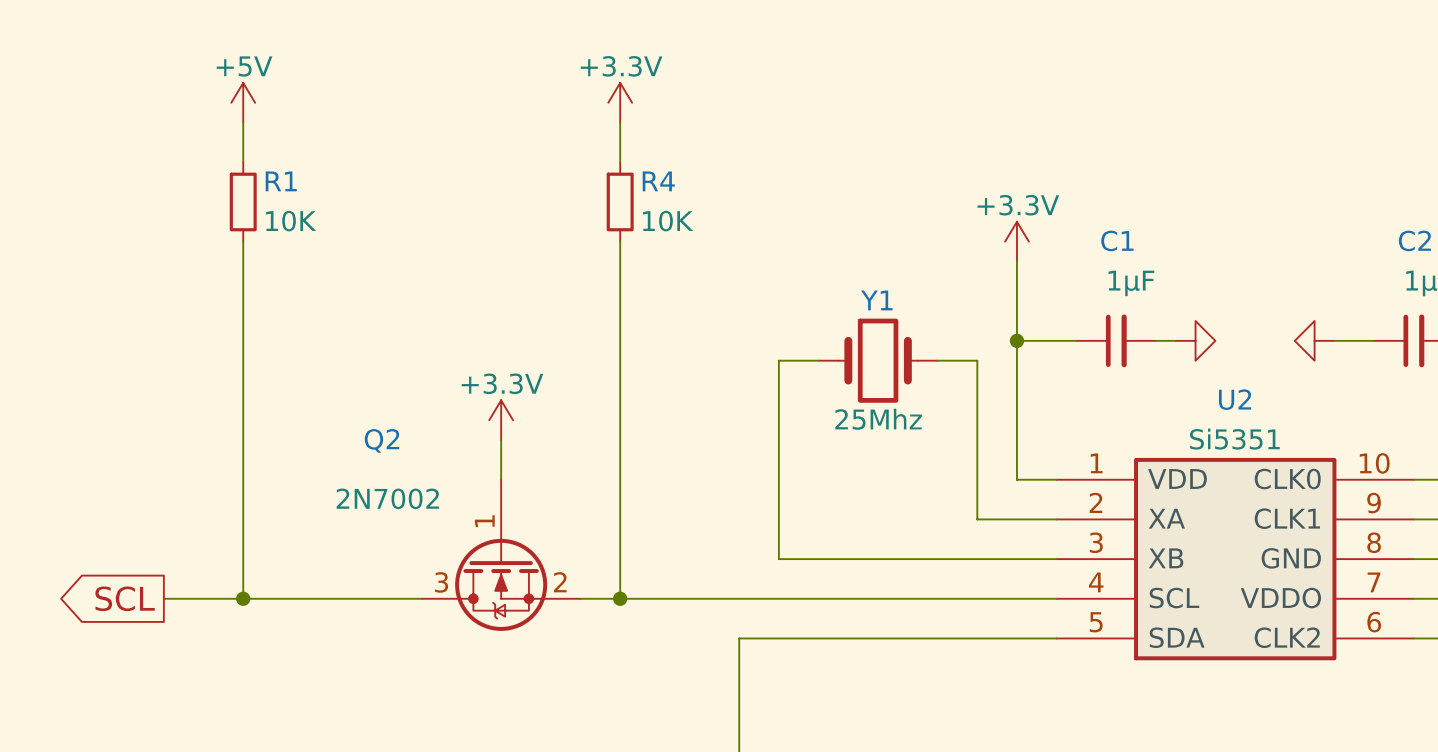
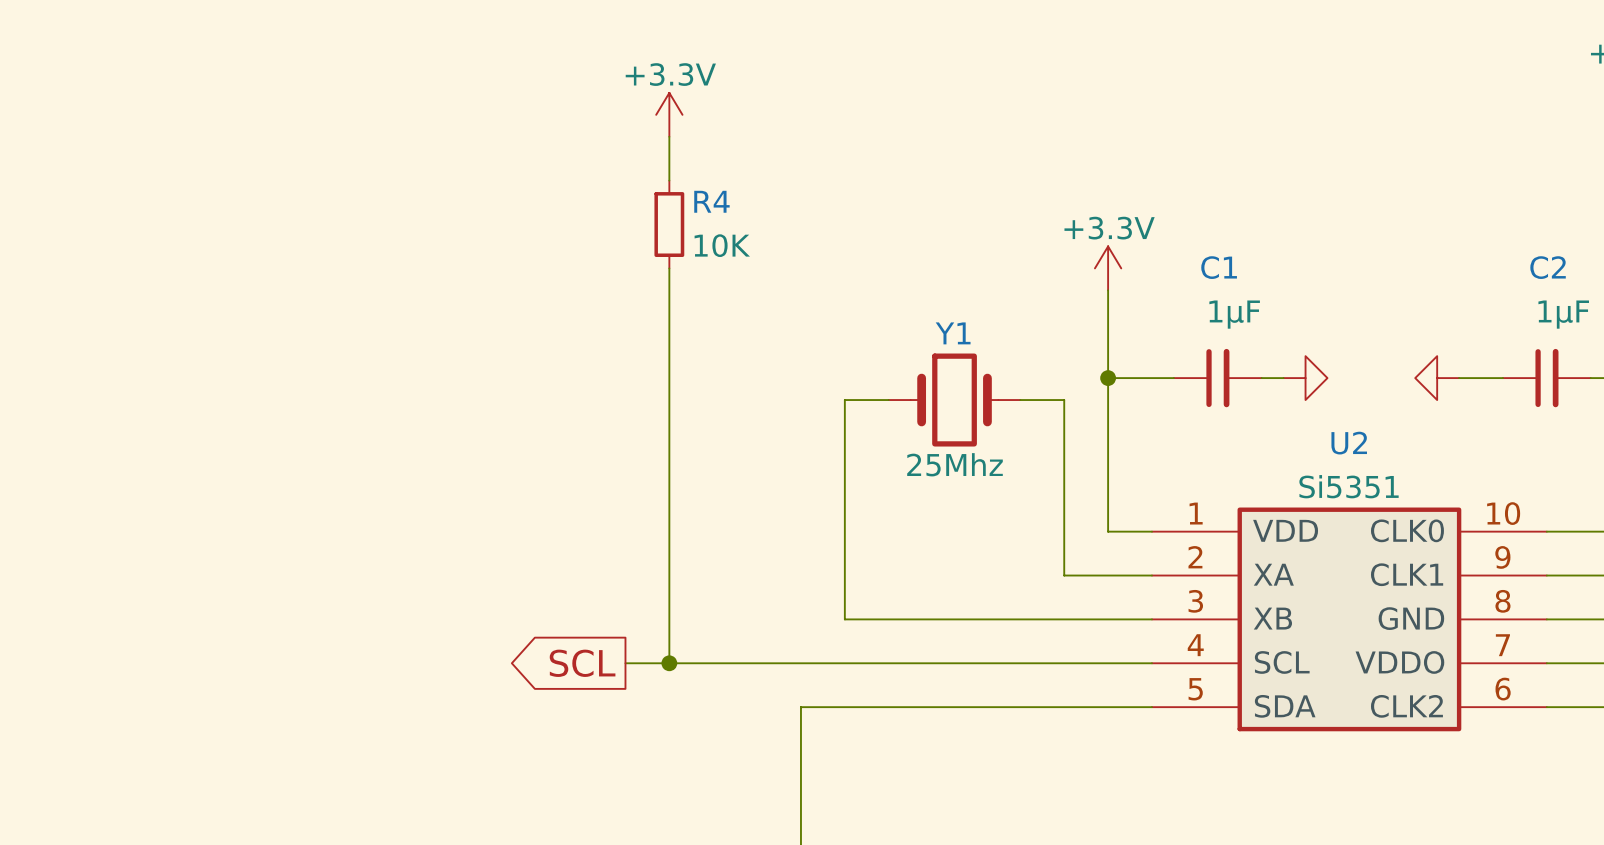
power symbol: +5V (243, 102) -> none
wire: (243, 122) (243, 162) -> none
R1: 10K (243, 201) -> none
wire: (243, 241) (243, 598) -> none
power symbol: +3.3V (501, 420) -> none
wire: (501, 440) (501, 479) -> none
Q2: 2N7002 (501, 555) -> none
global label: SCL (125, 598) -> none
wire: (163, 598) (421, 598) -> none
junction: (243, 598) -> none
global label: none -> SCL (582, 663)

